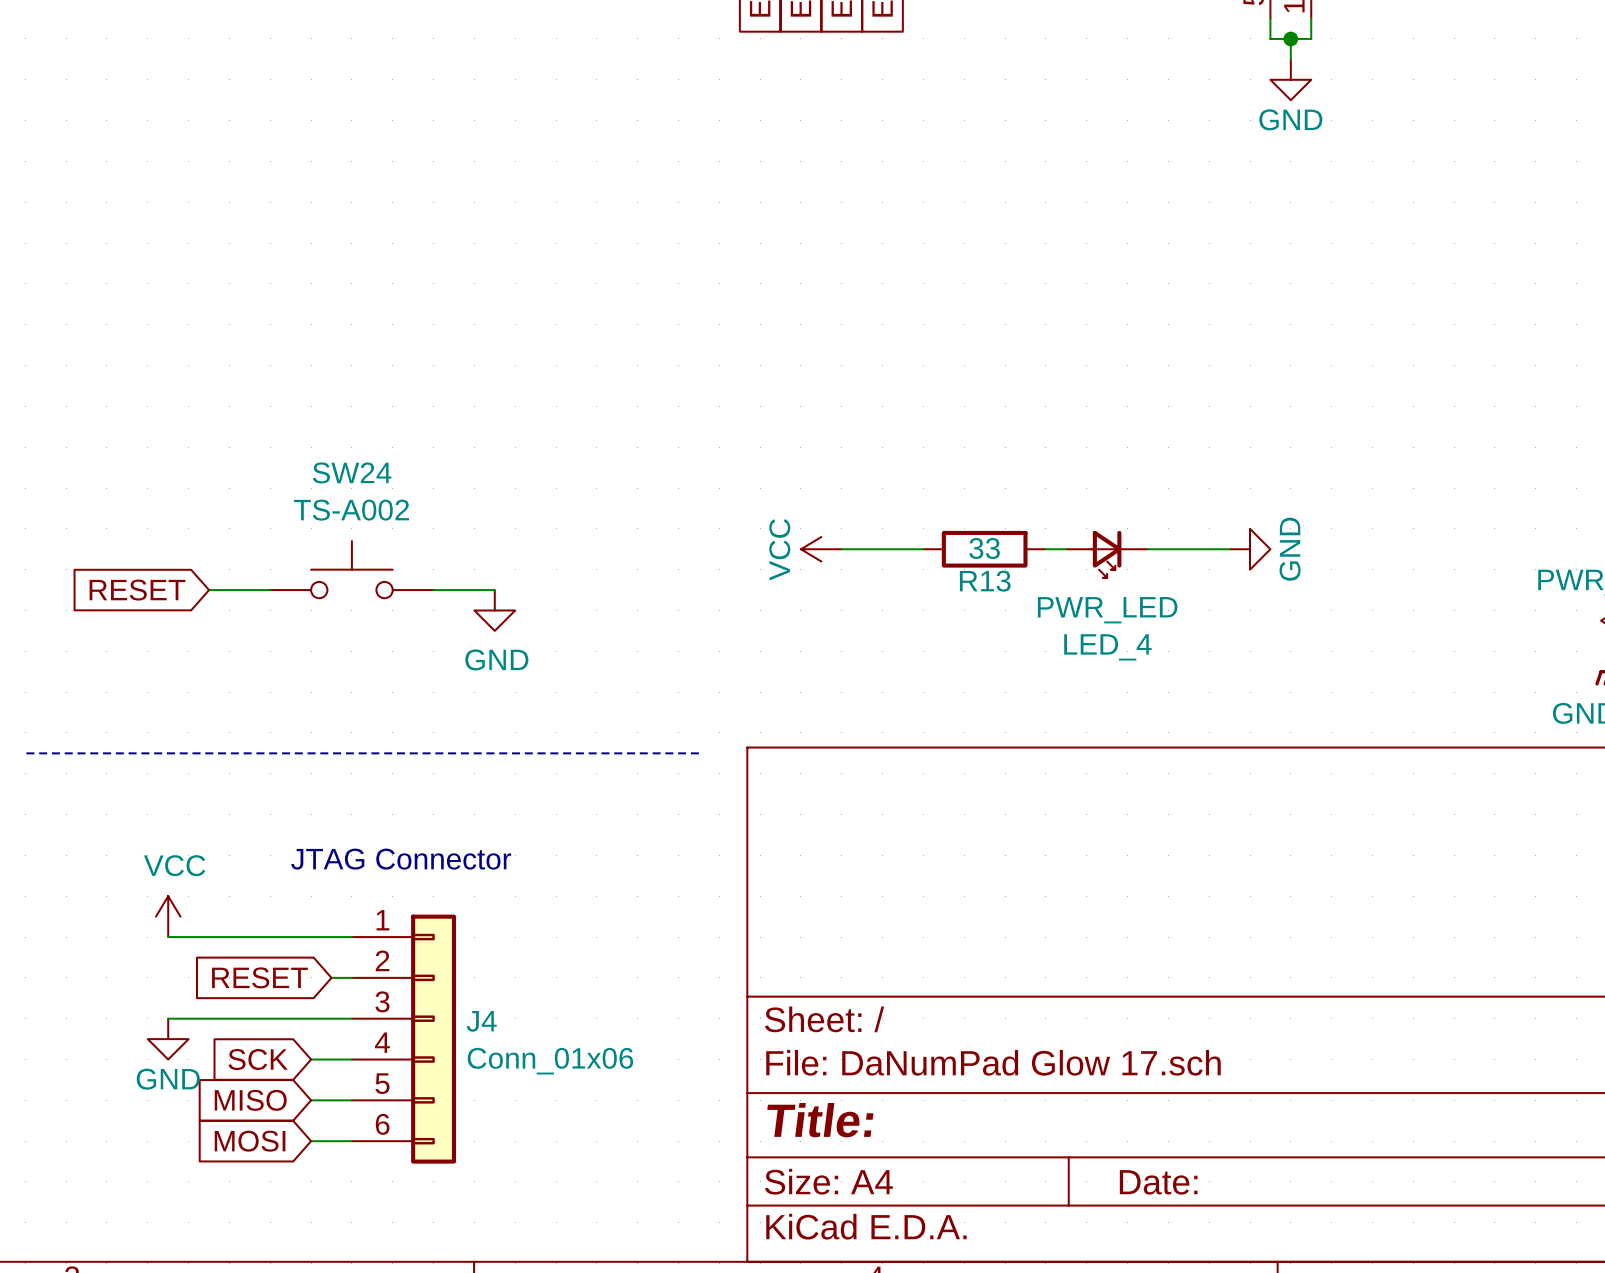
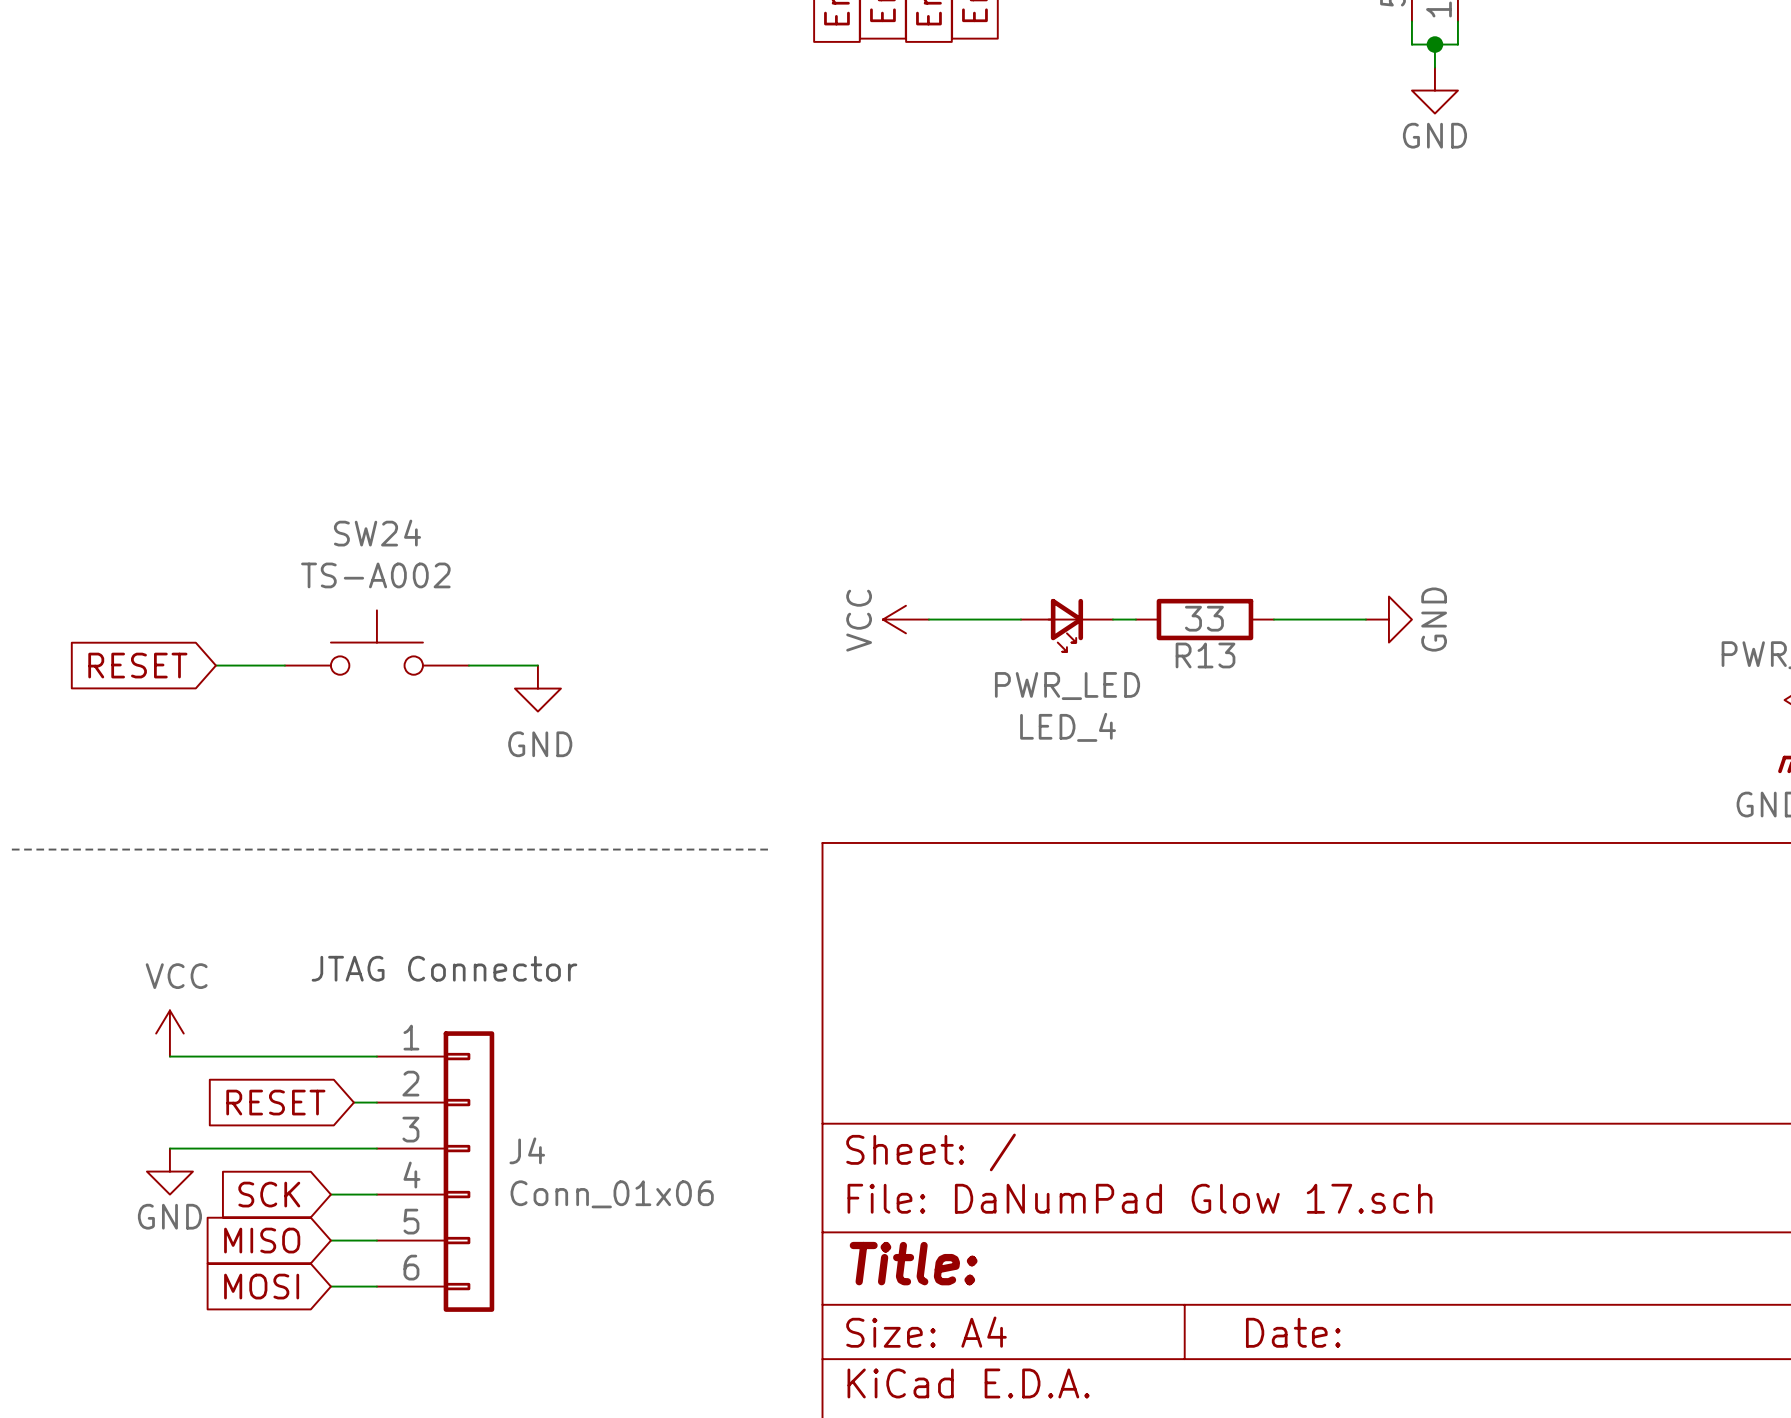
R13 position: (984, 549) -> (1204, 619)
wire: (1045, 549) (1066, 549) -> (1112, 619) (1135, 619)
LED_4 position: (1107, 554) -> (1066, 625)

